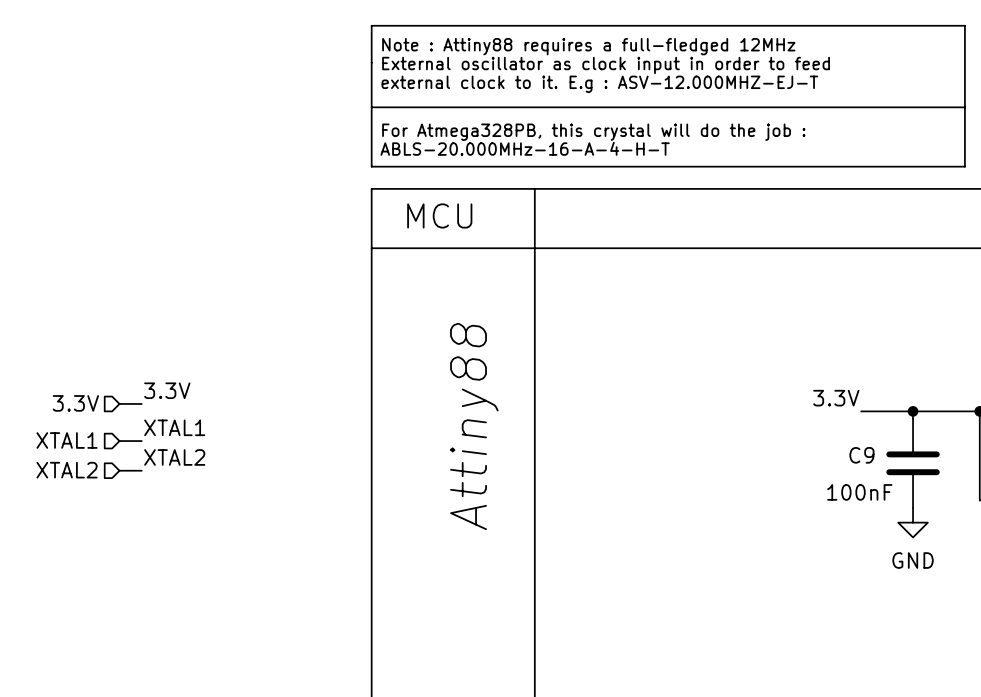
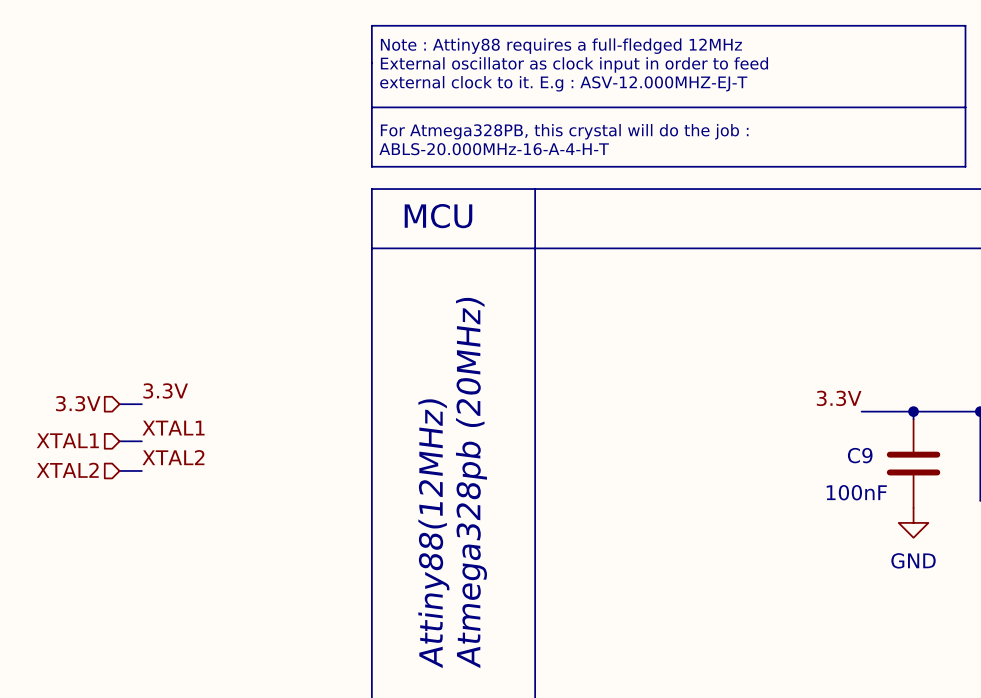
text: Attiny88 (474, 426) -> none
text: none -> Atmega328pb (20MHz) (471, 482)
text: none -> Attiny88(12MHz) (433, 533)

